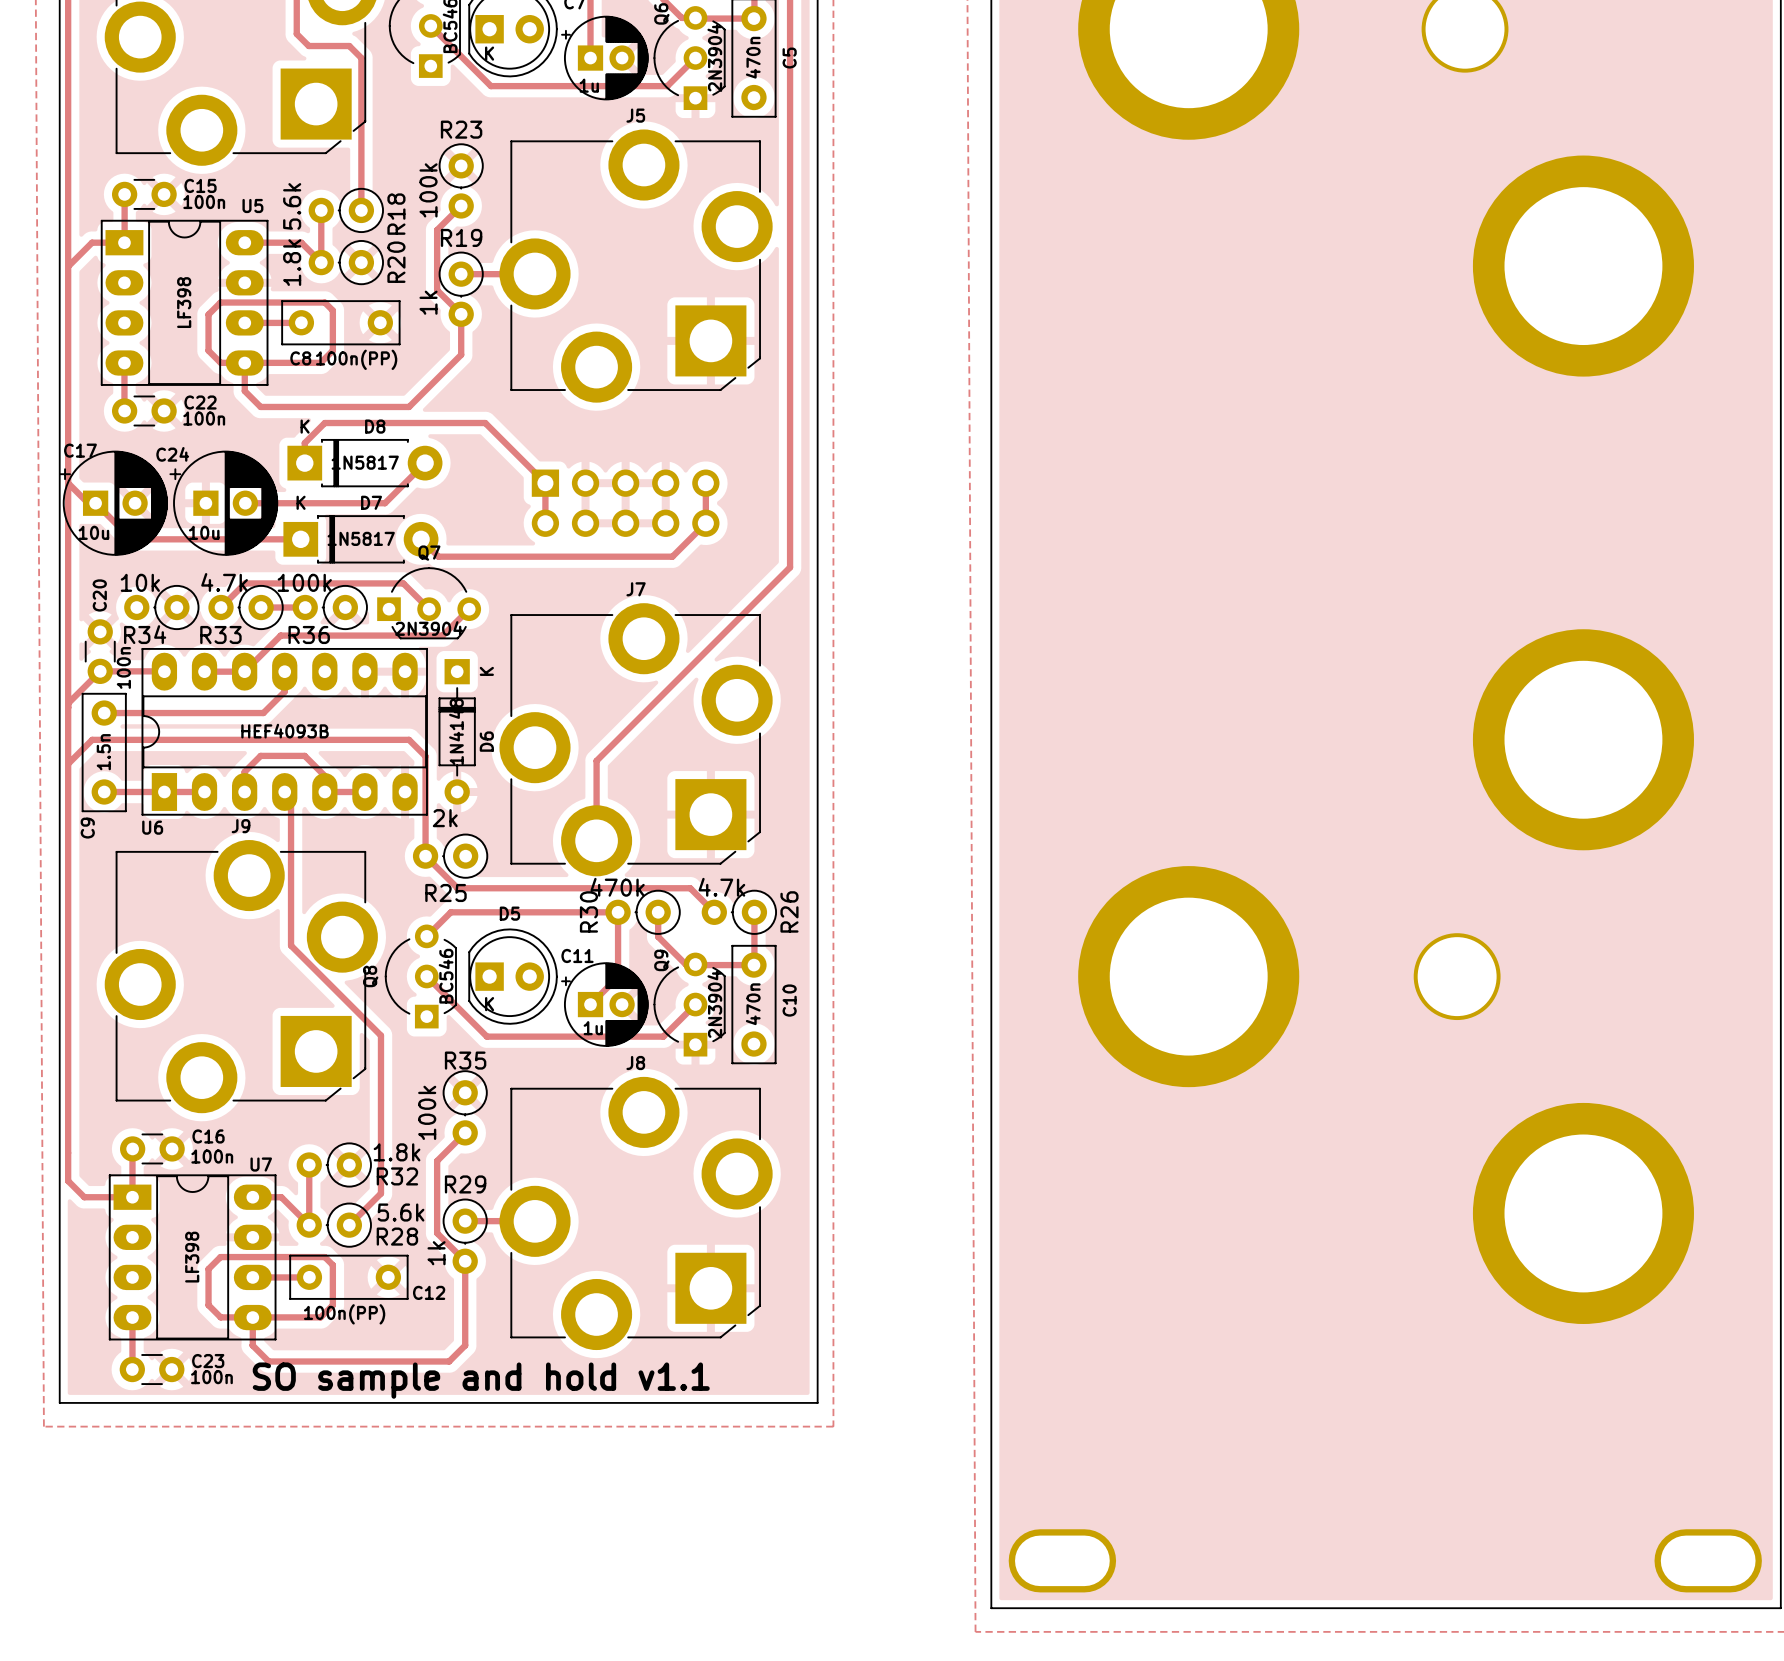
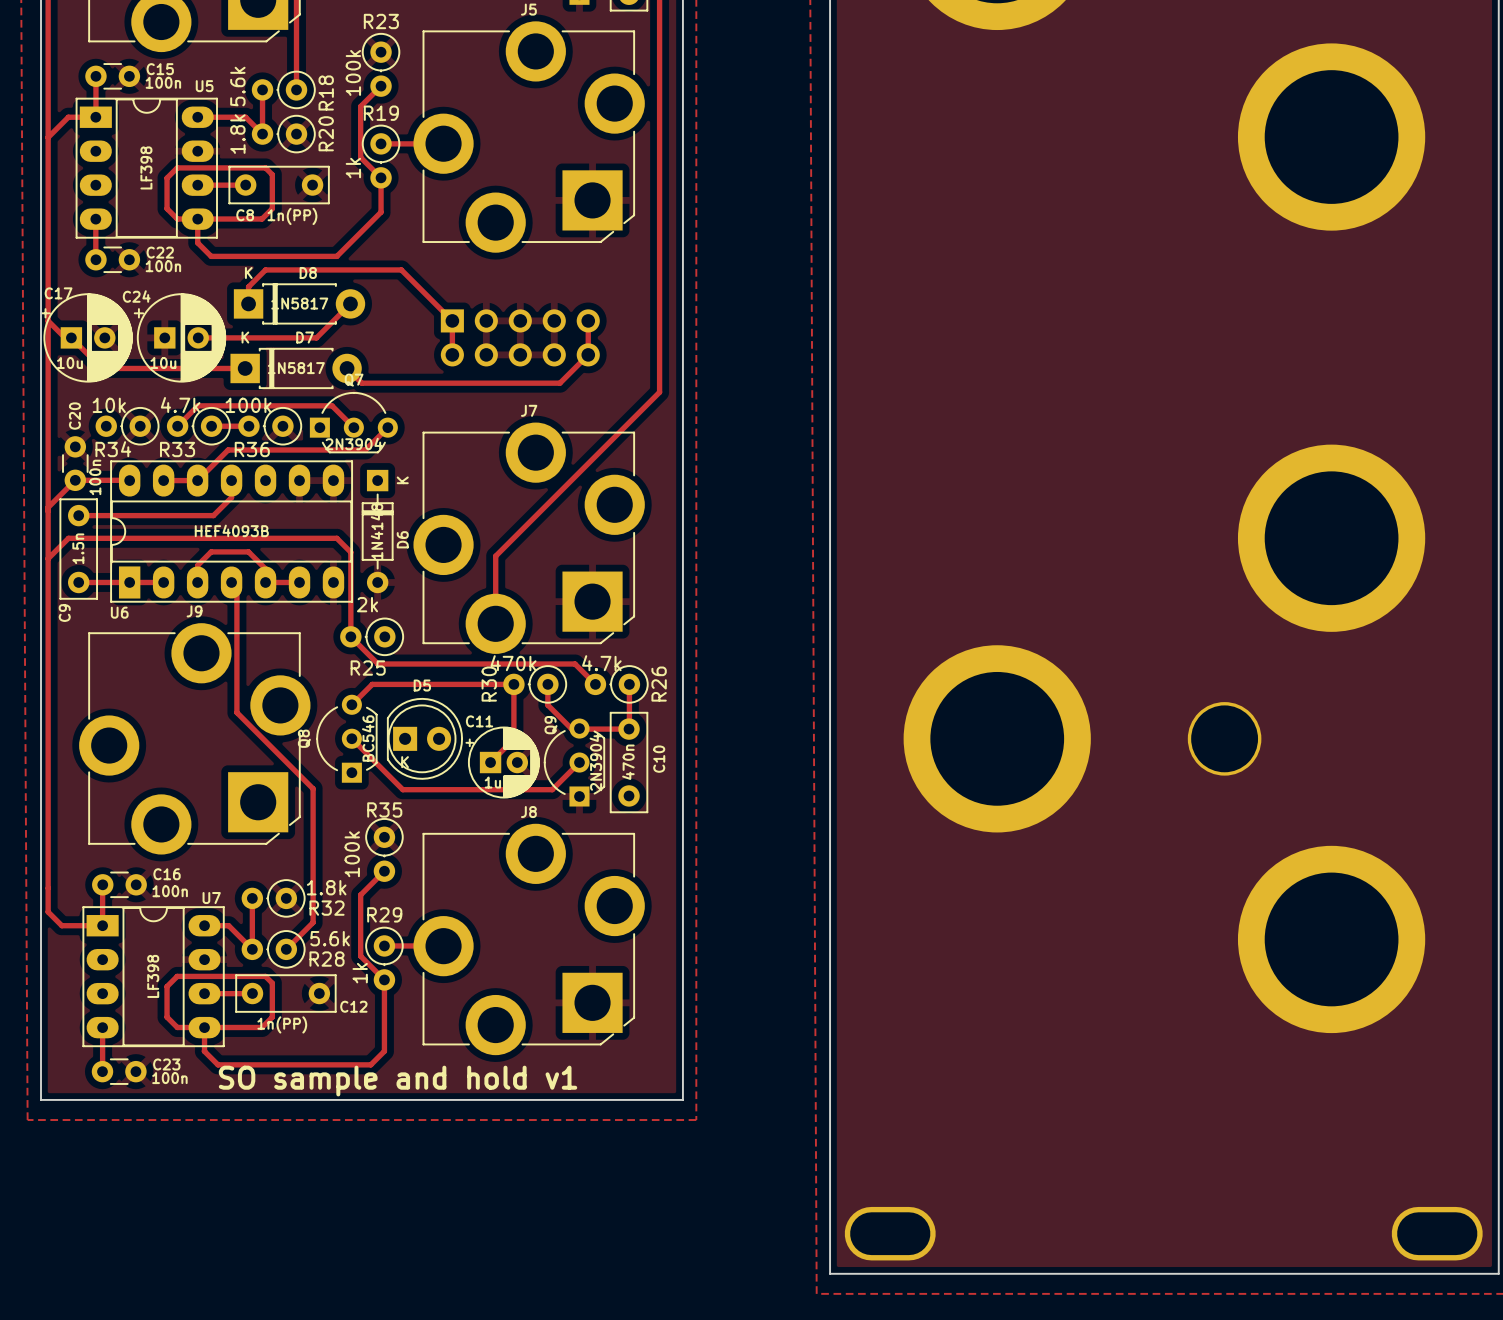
C8 value: 100n(PP) (356, 359) -> 1n(PP) (292, 216)
C12 value: 100n(PP) (344, 1314) -> 1n(PP) (282, 1024)
text: SO sample and hold v1.1 (481, 1380) -> SO sample and hold v1 (398, 1081)

